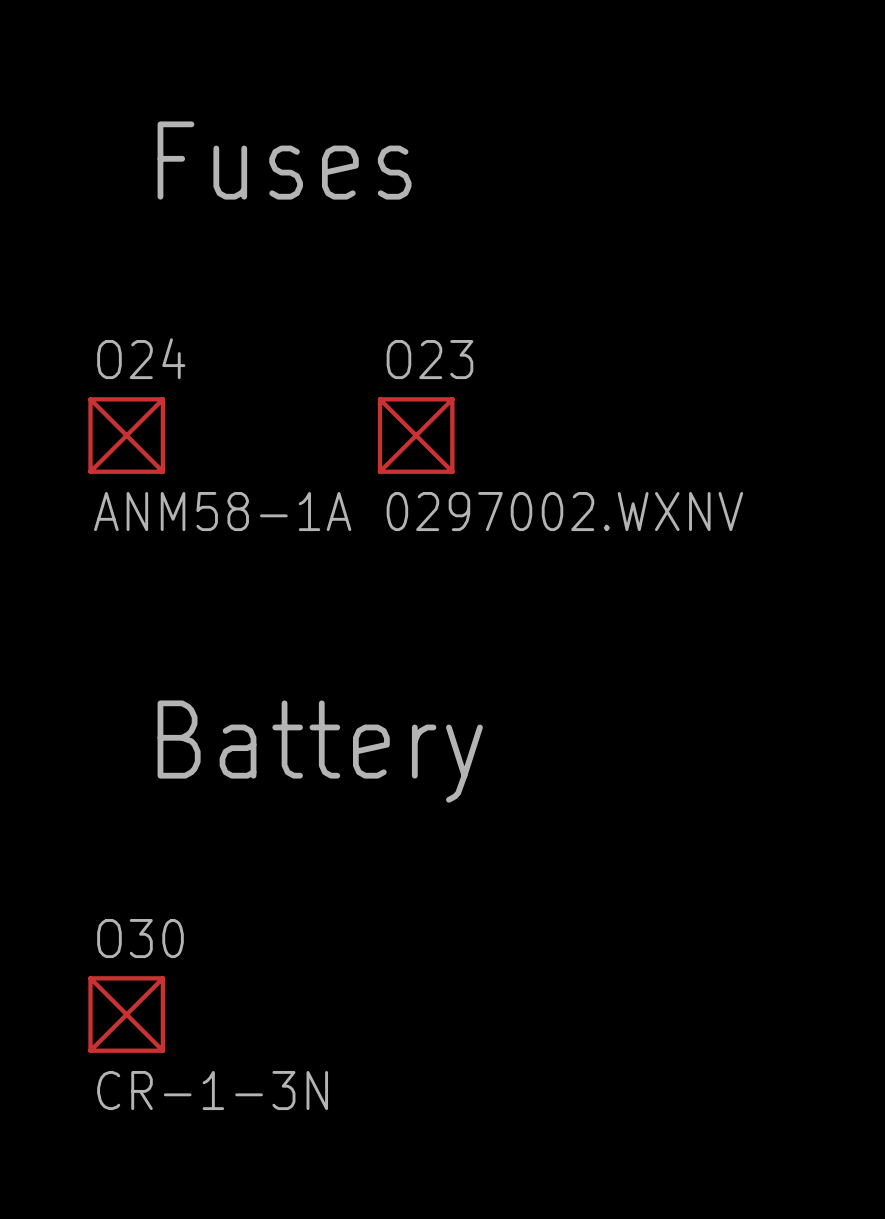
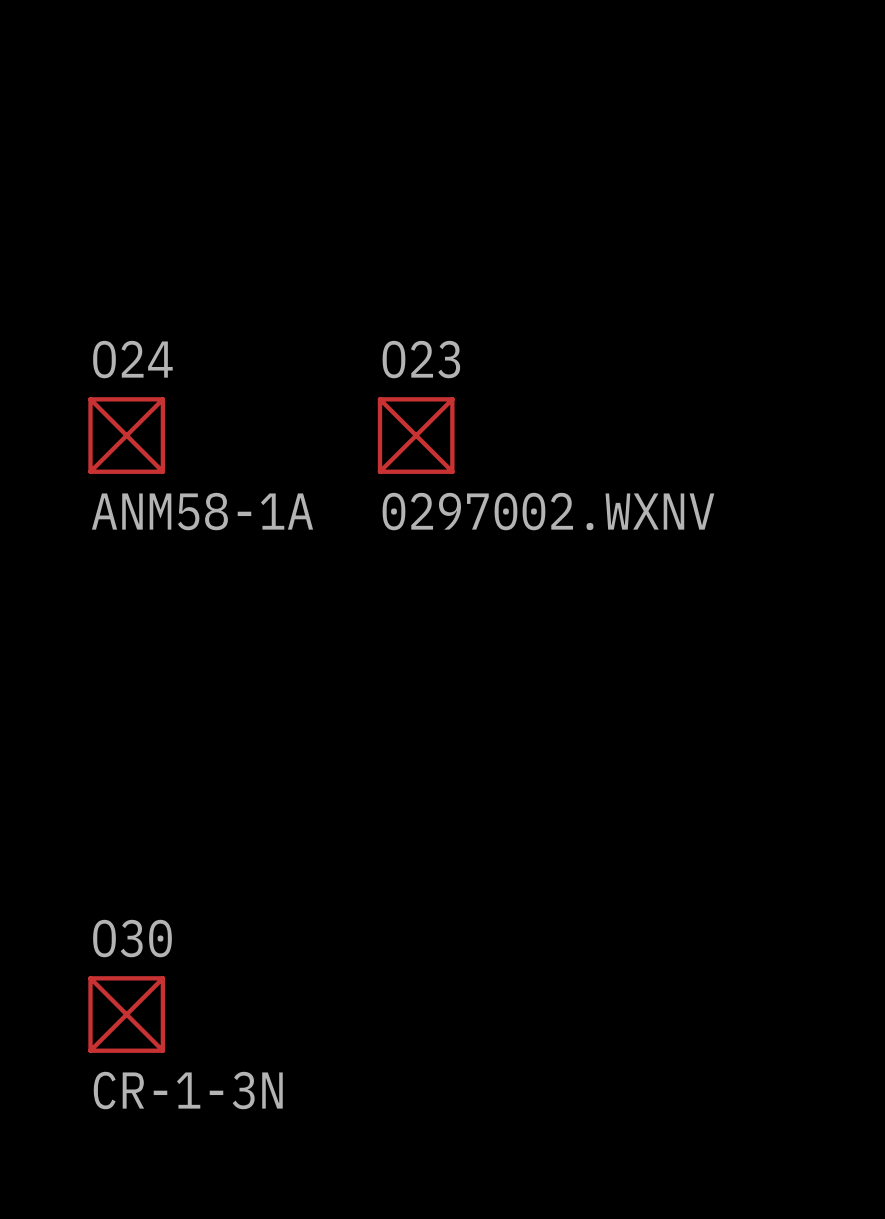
text: Fuses (284, 160) -> none
text: Battery (320, 751) -> none

